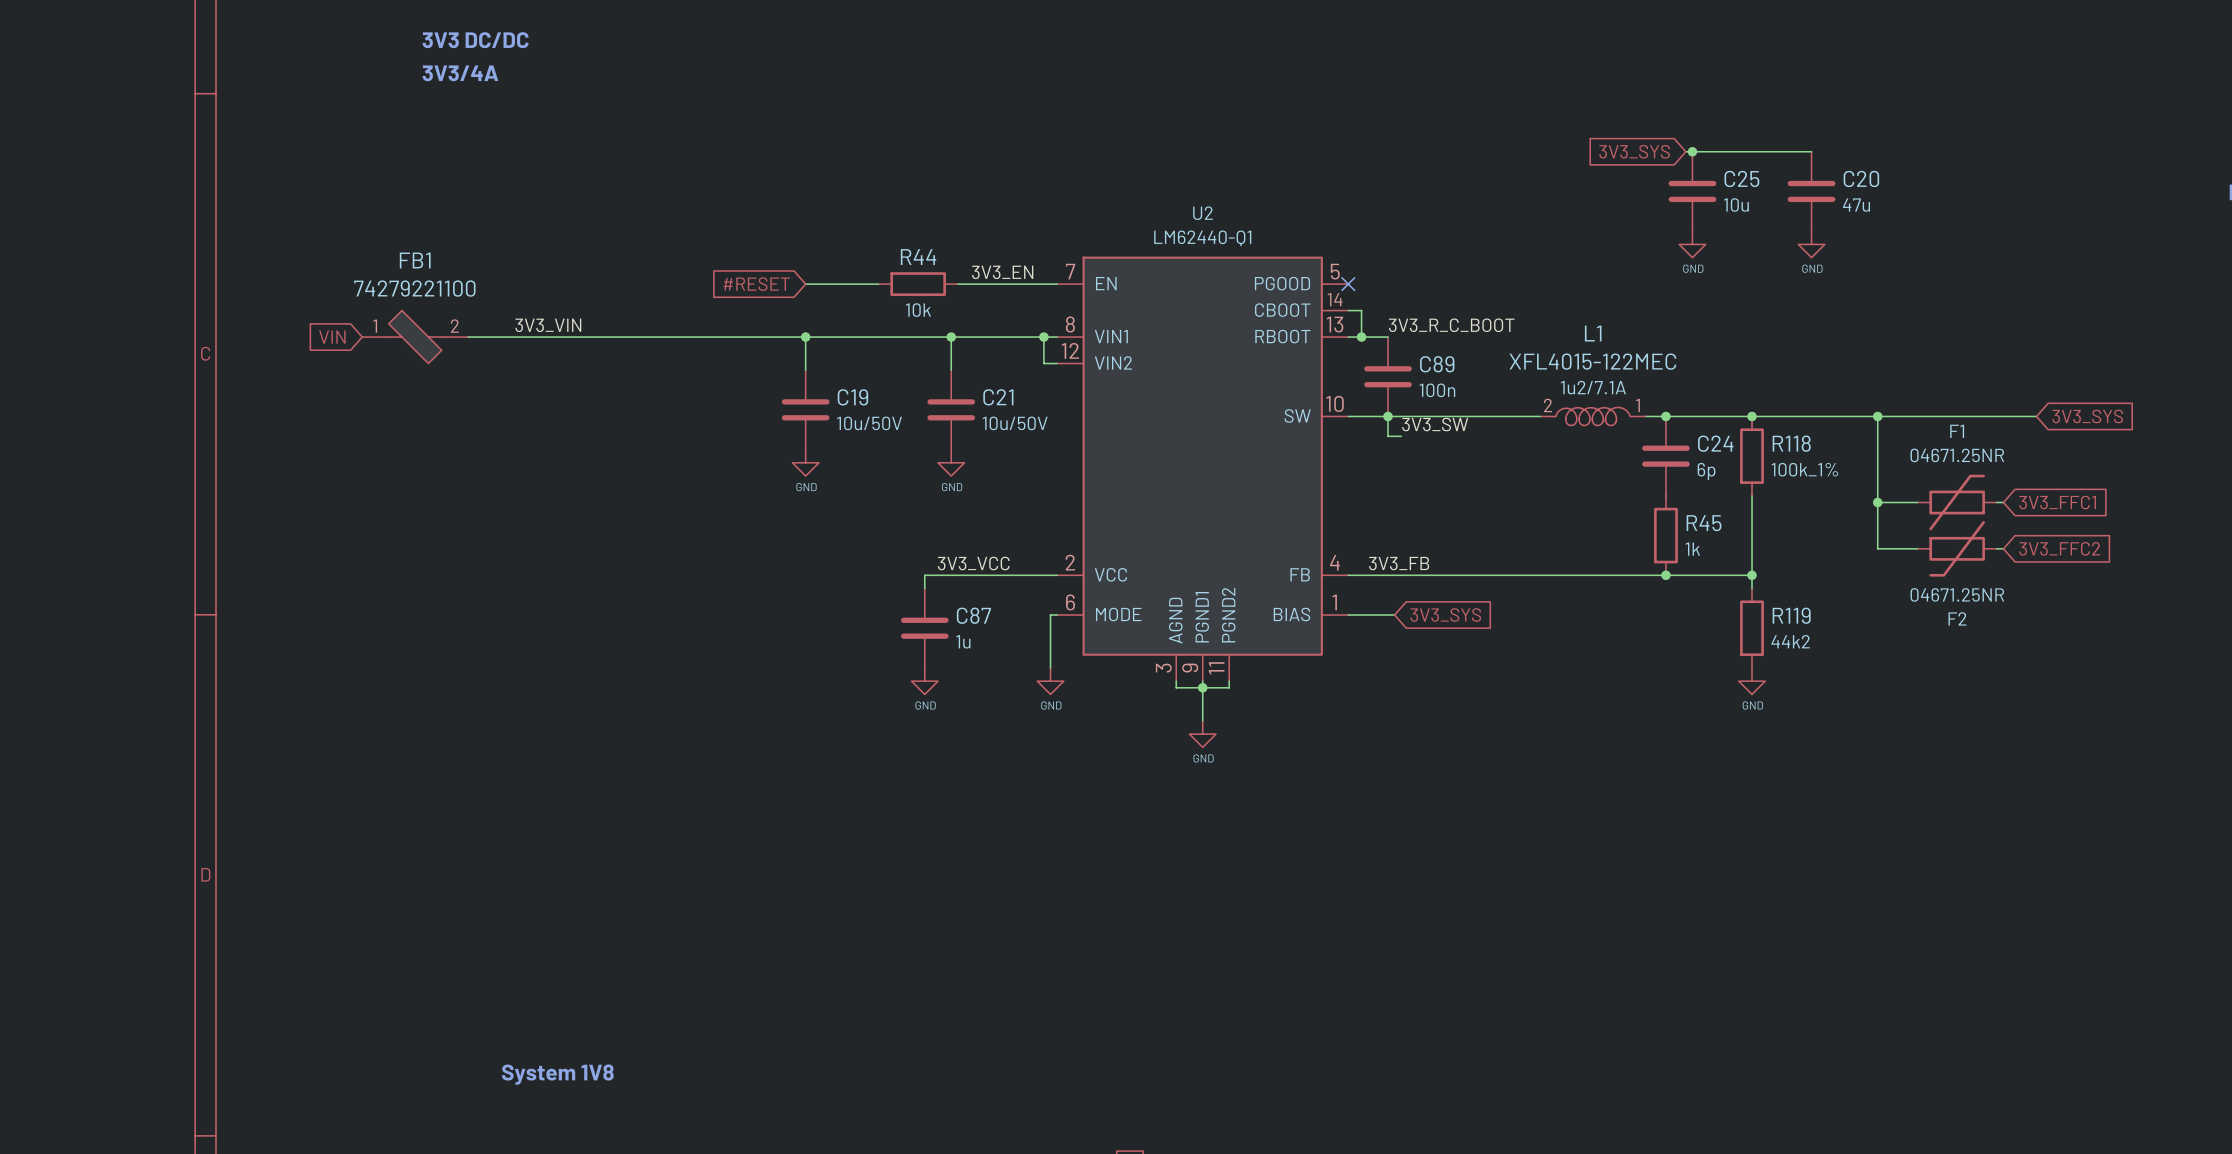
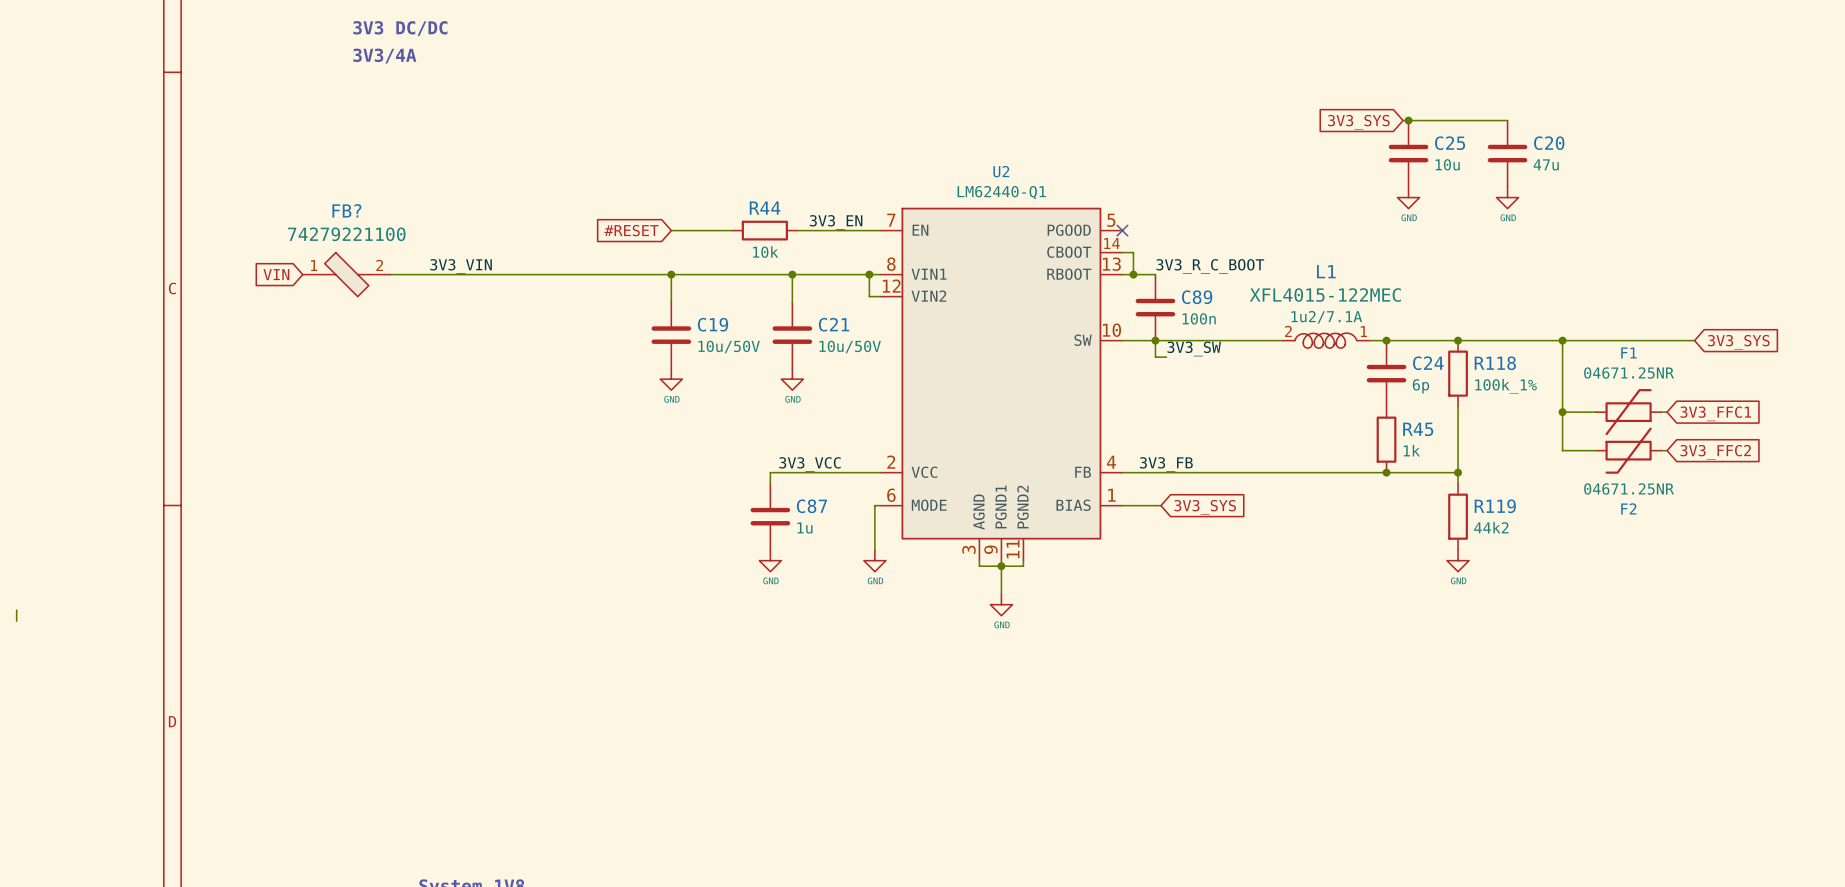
FB1 name: FB1 (415, 260) -> FB? (346, 210)
wire: none -> (16, 610) (16, 621)

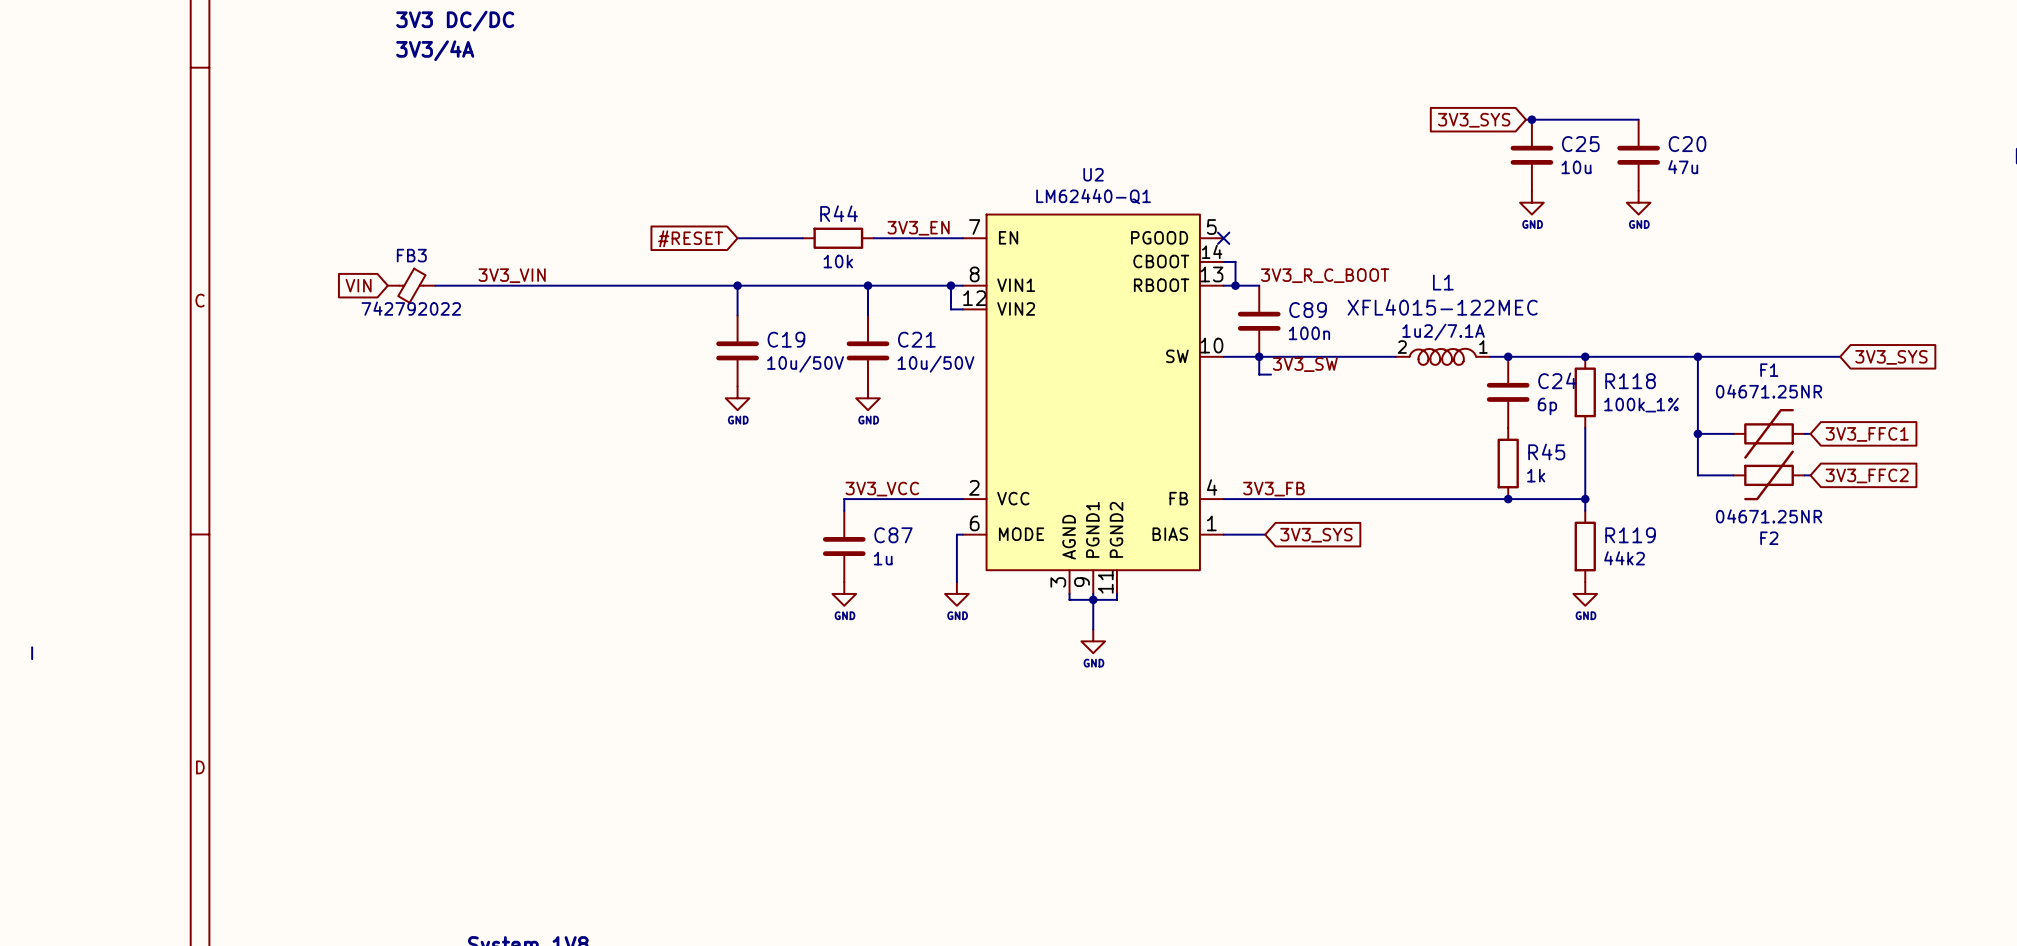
global label position: VIN (276, 274) -> VIN (358, 285)
FB?: 74279221100 (346, 274) -> none
FB3: none -> 742792022 (411, 285)

